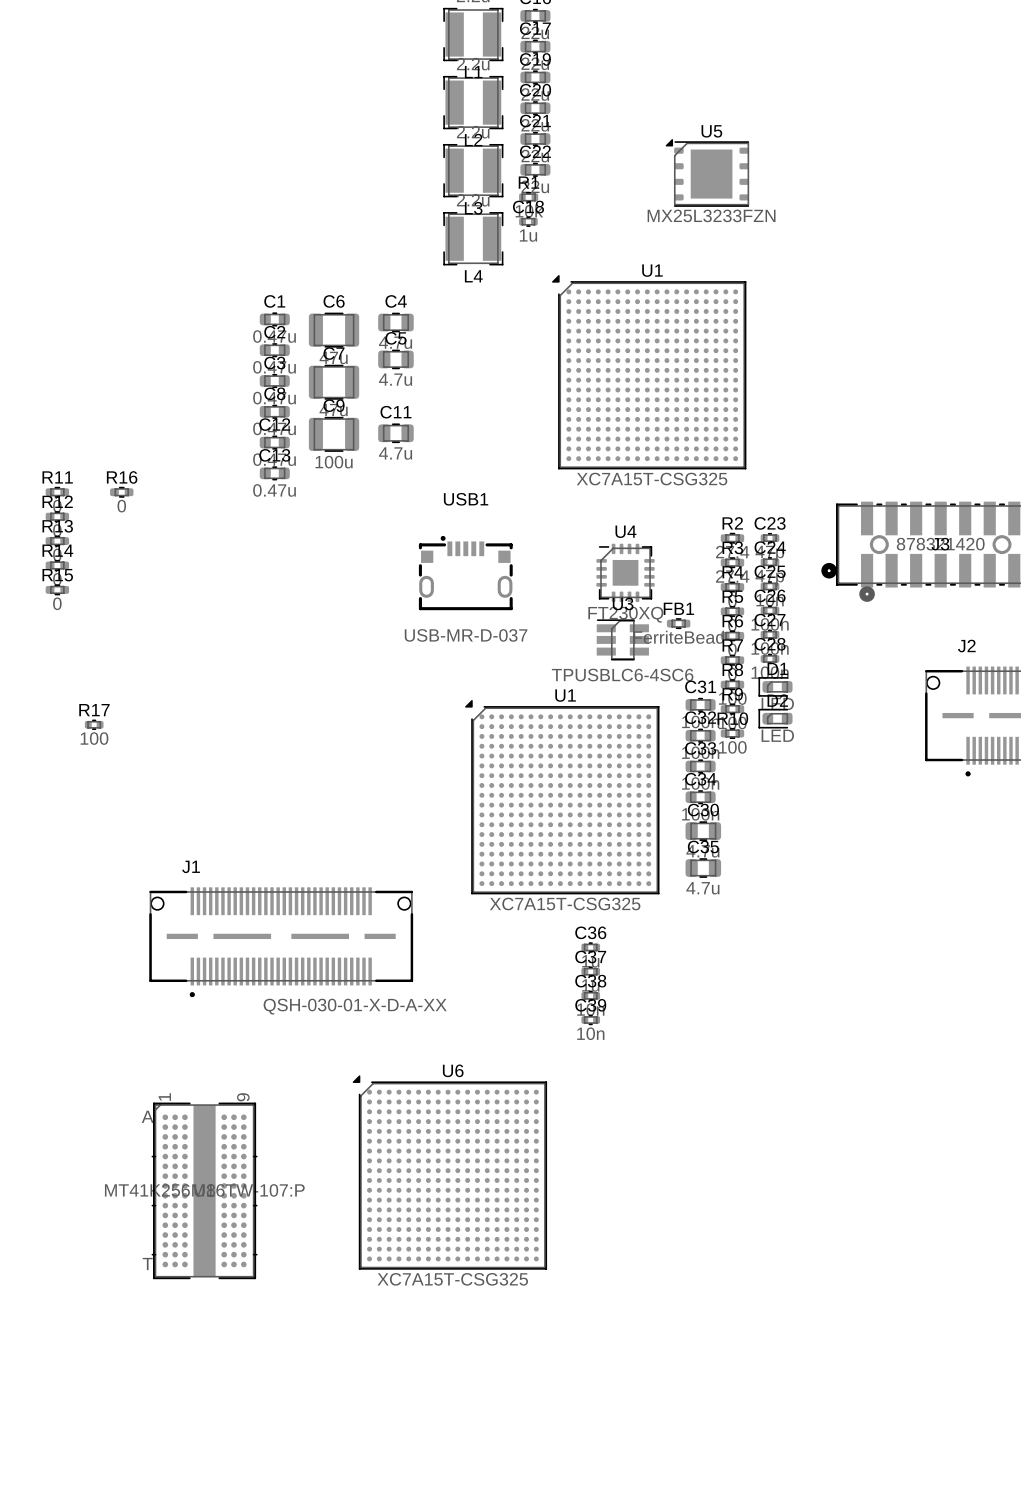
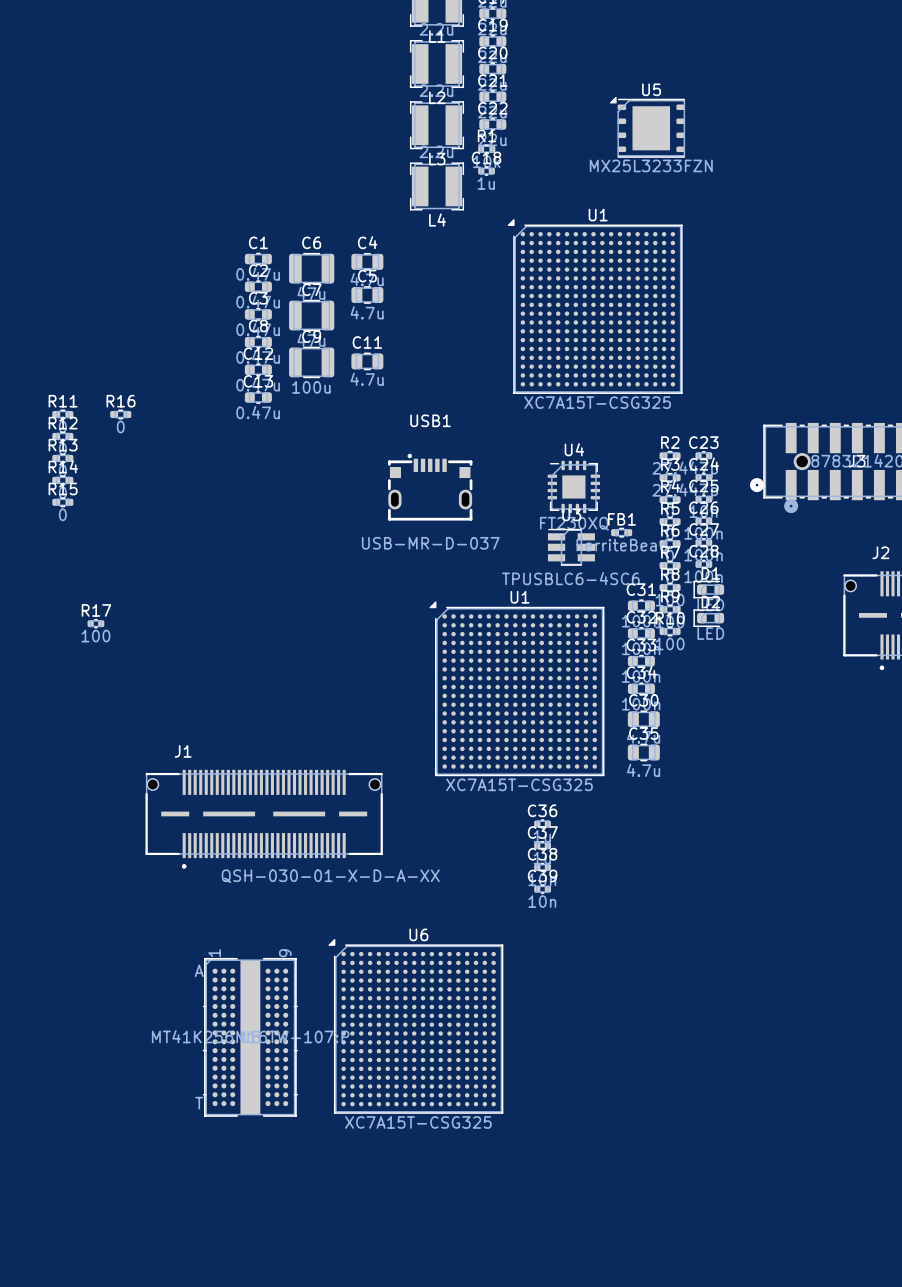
part position: (204, 1190) -> (250, 1037)

